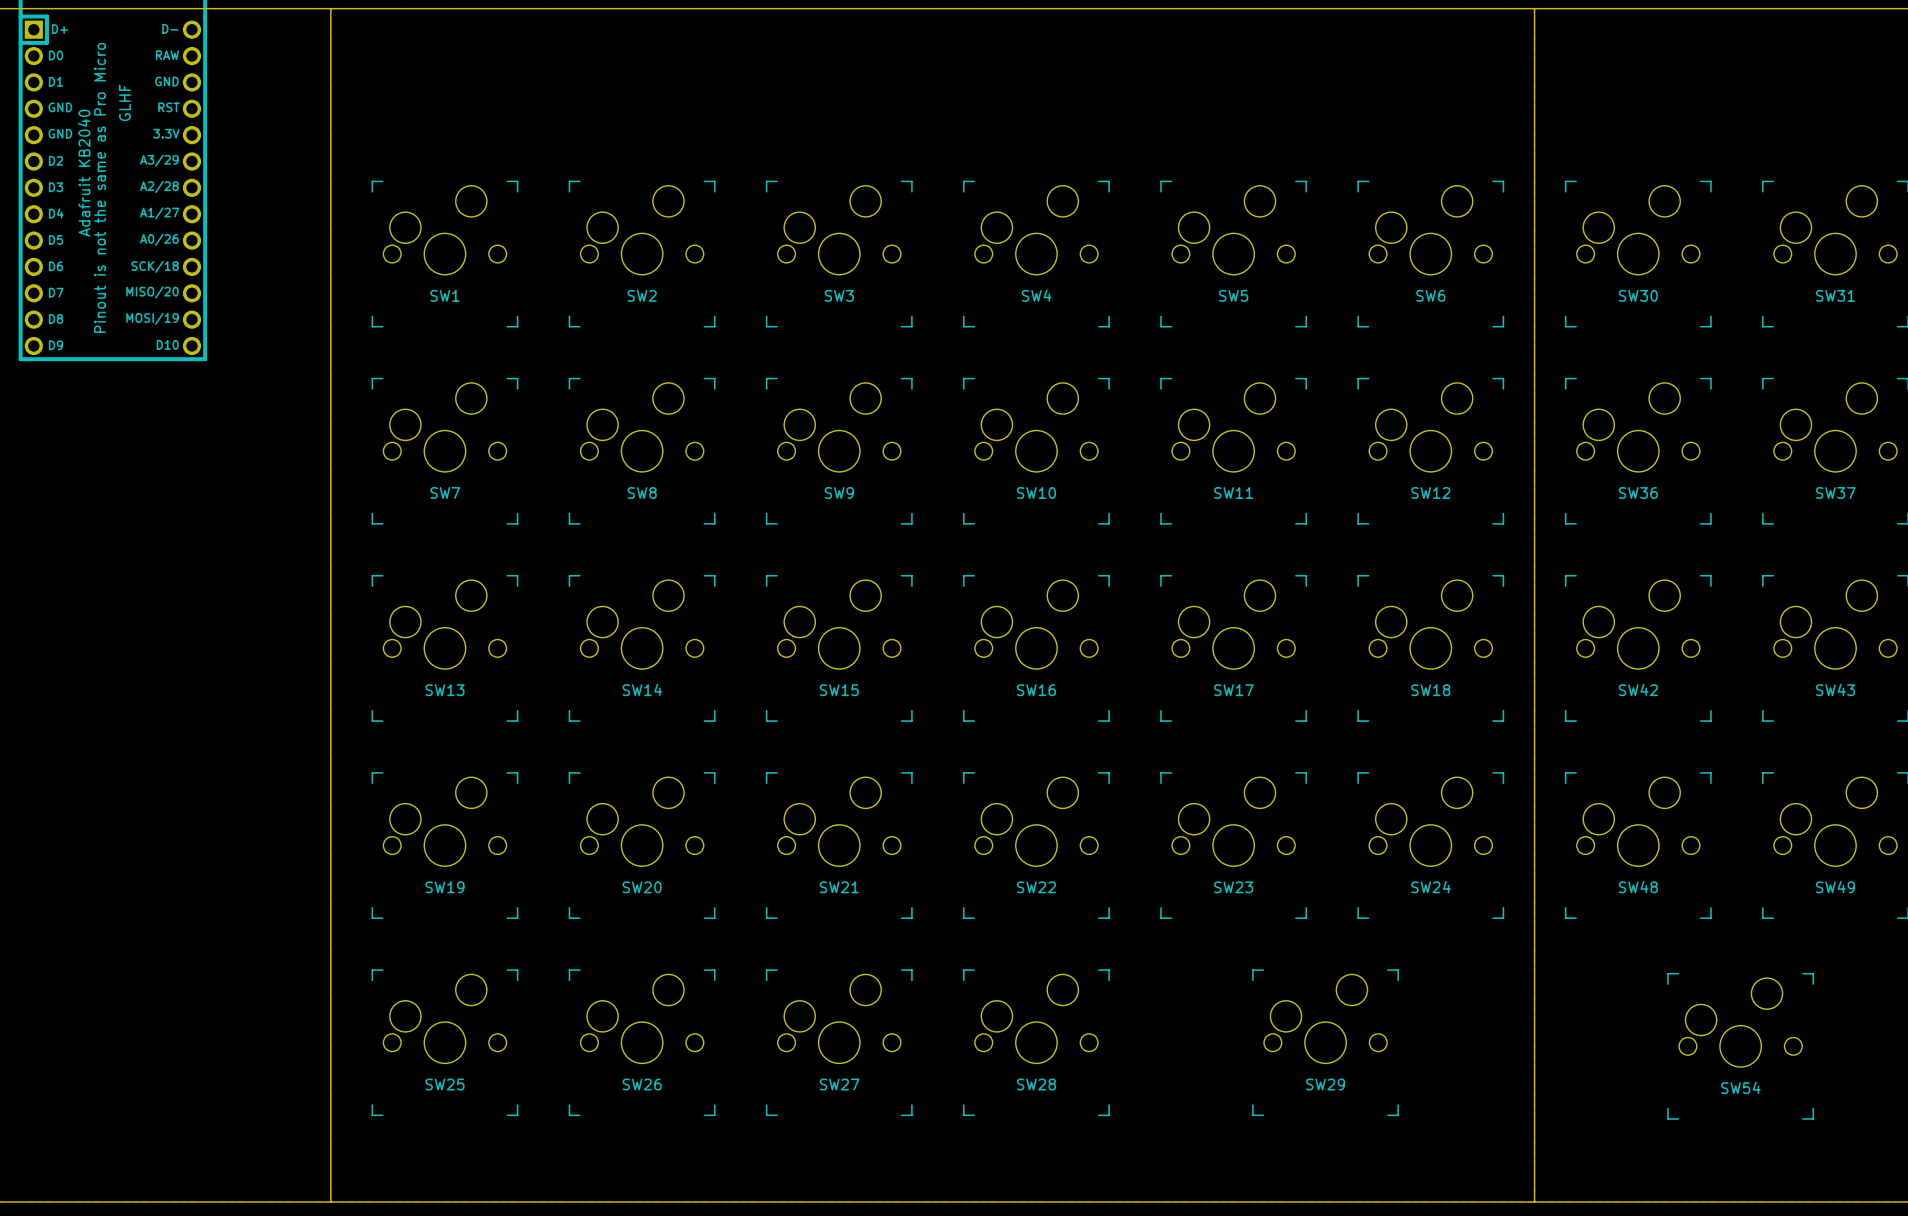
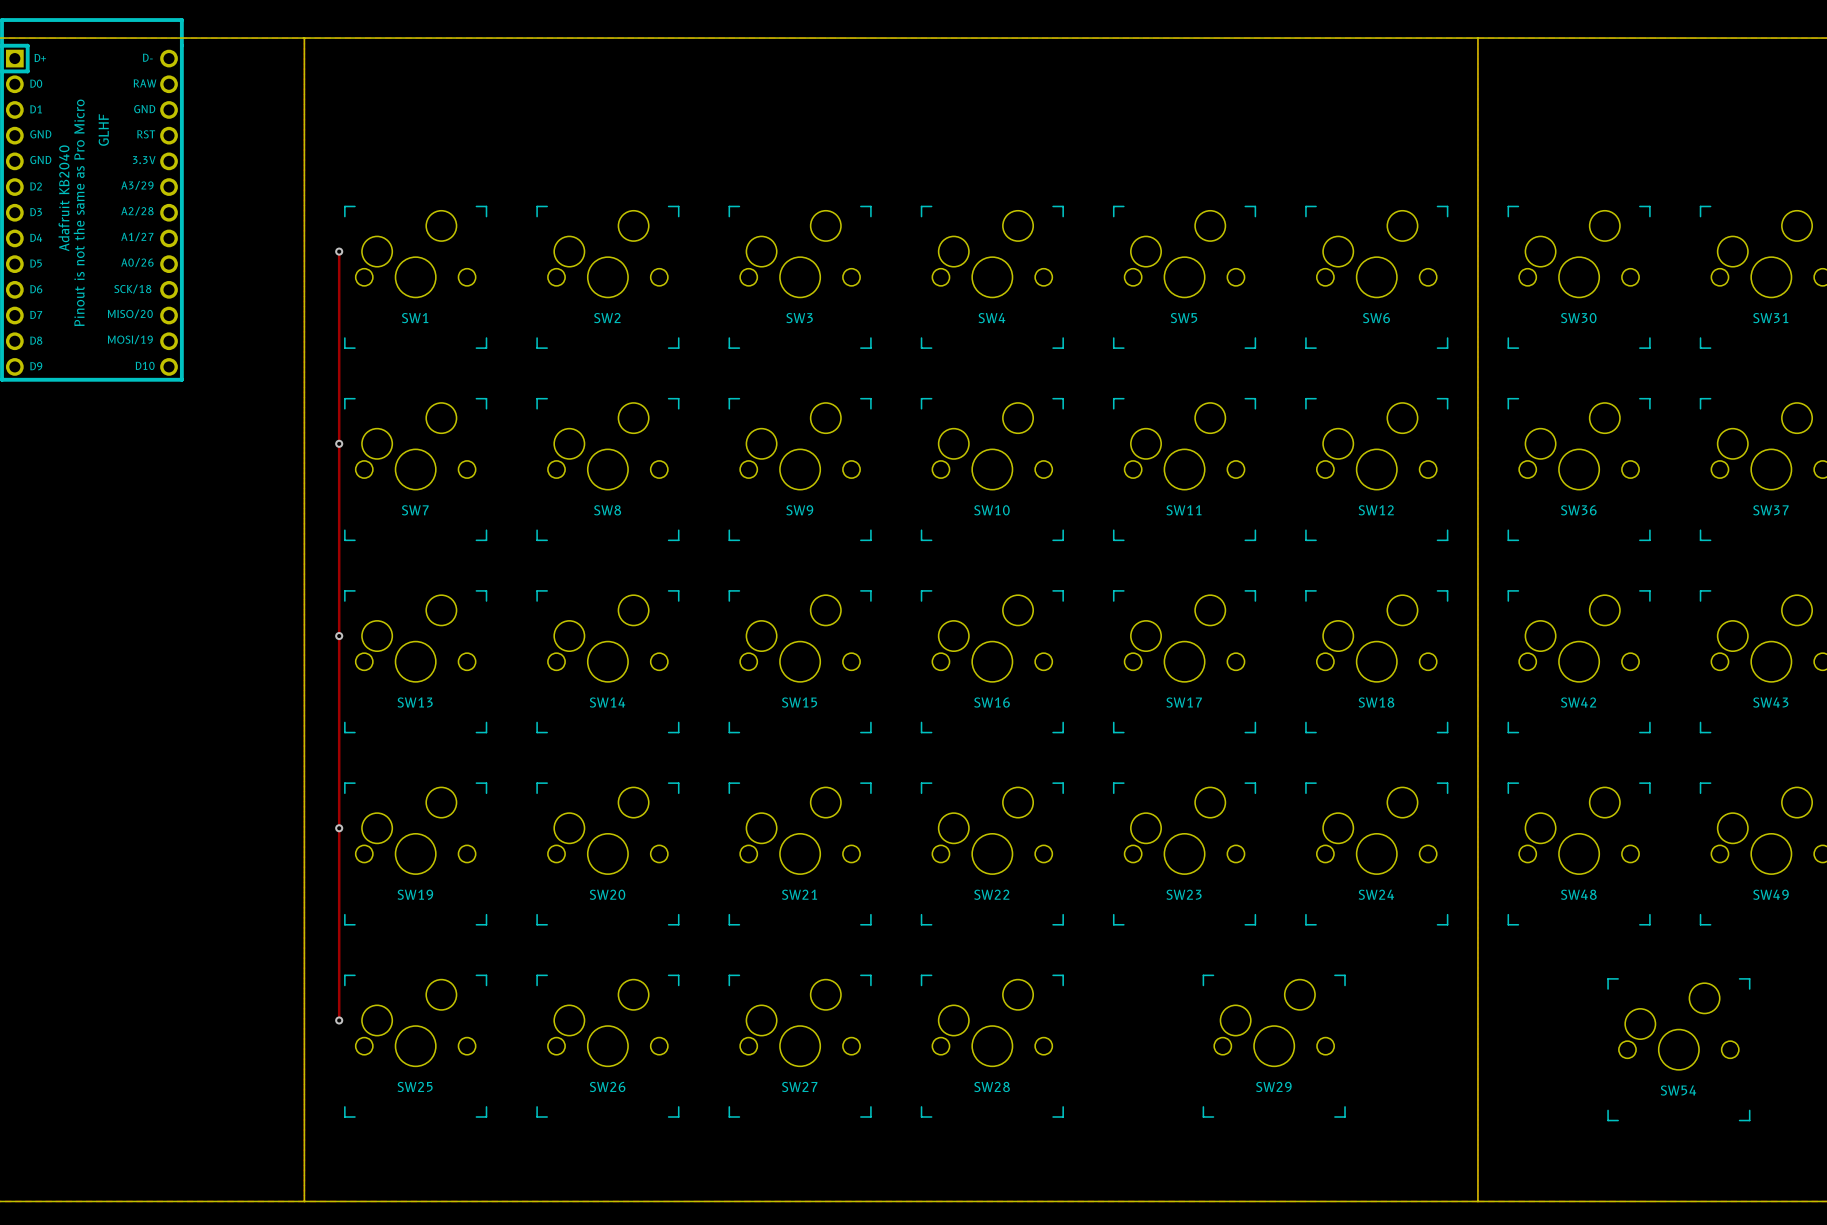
track: none -> (339, 251) (339, 1020)
via: none -> (339, 251)
via: none -> (339, 443)
via: none -> (339, 636)
via: none -> (339, 828)
via: none -> (339, 1020)

